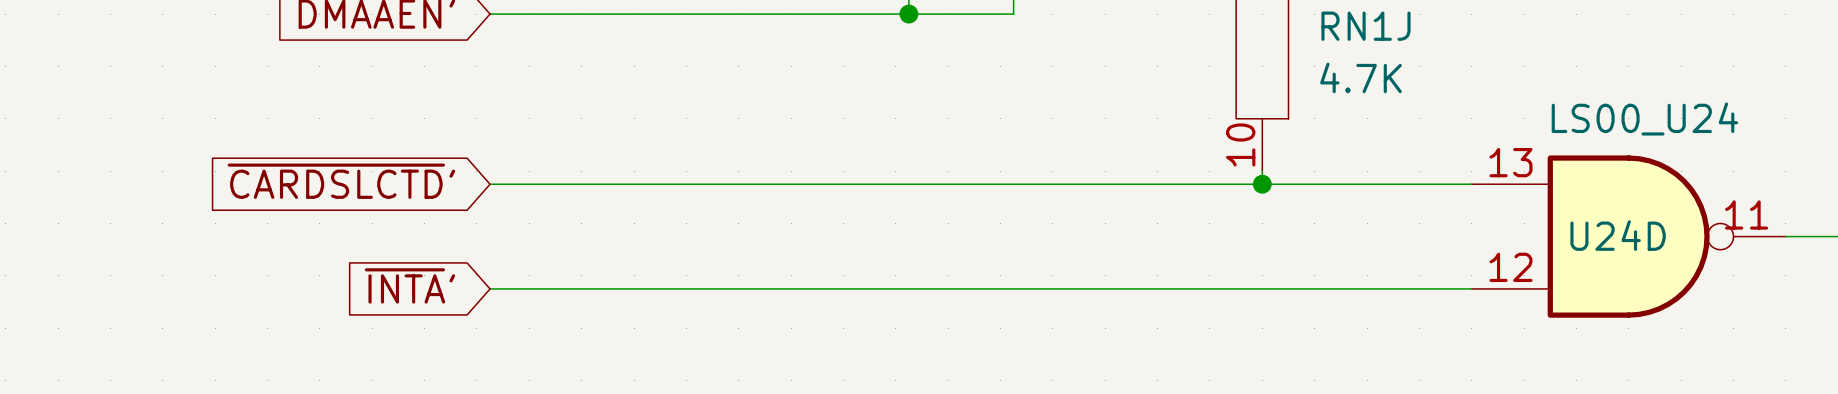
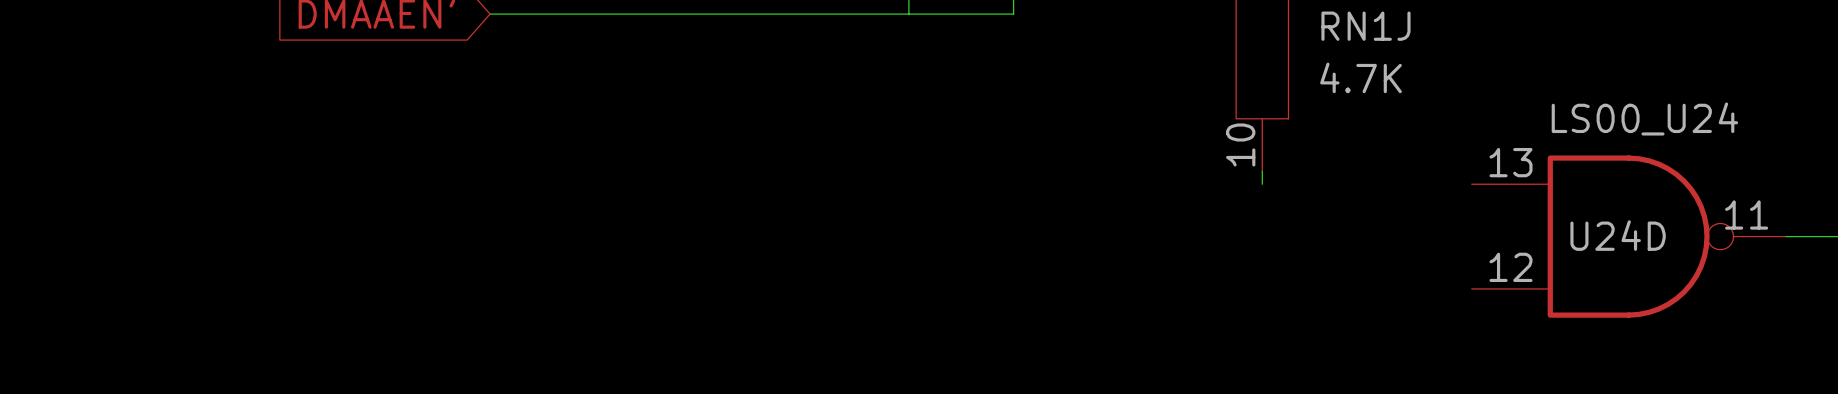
junction: (908, 14) -> none
global label: ~{CARDSLCTD}' (341, 181) -> none
wire: (490, 184) (1471, 184) -> none
junction: (1262, 184) -> none
global label: ~{INTA}' (409, 285) -> none
wire: (490, 288) (1471, 288) -> none

